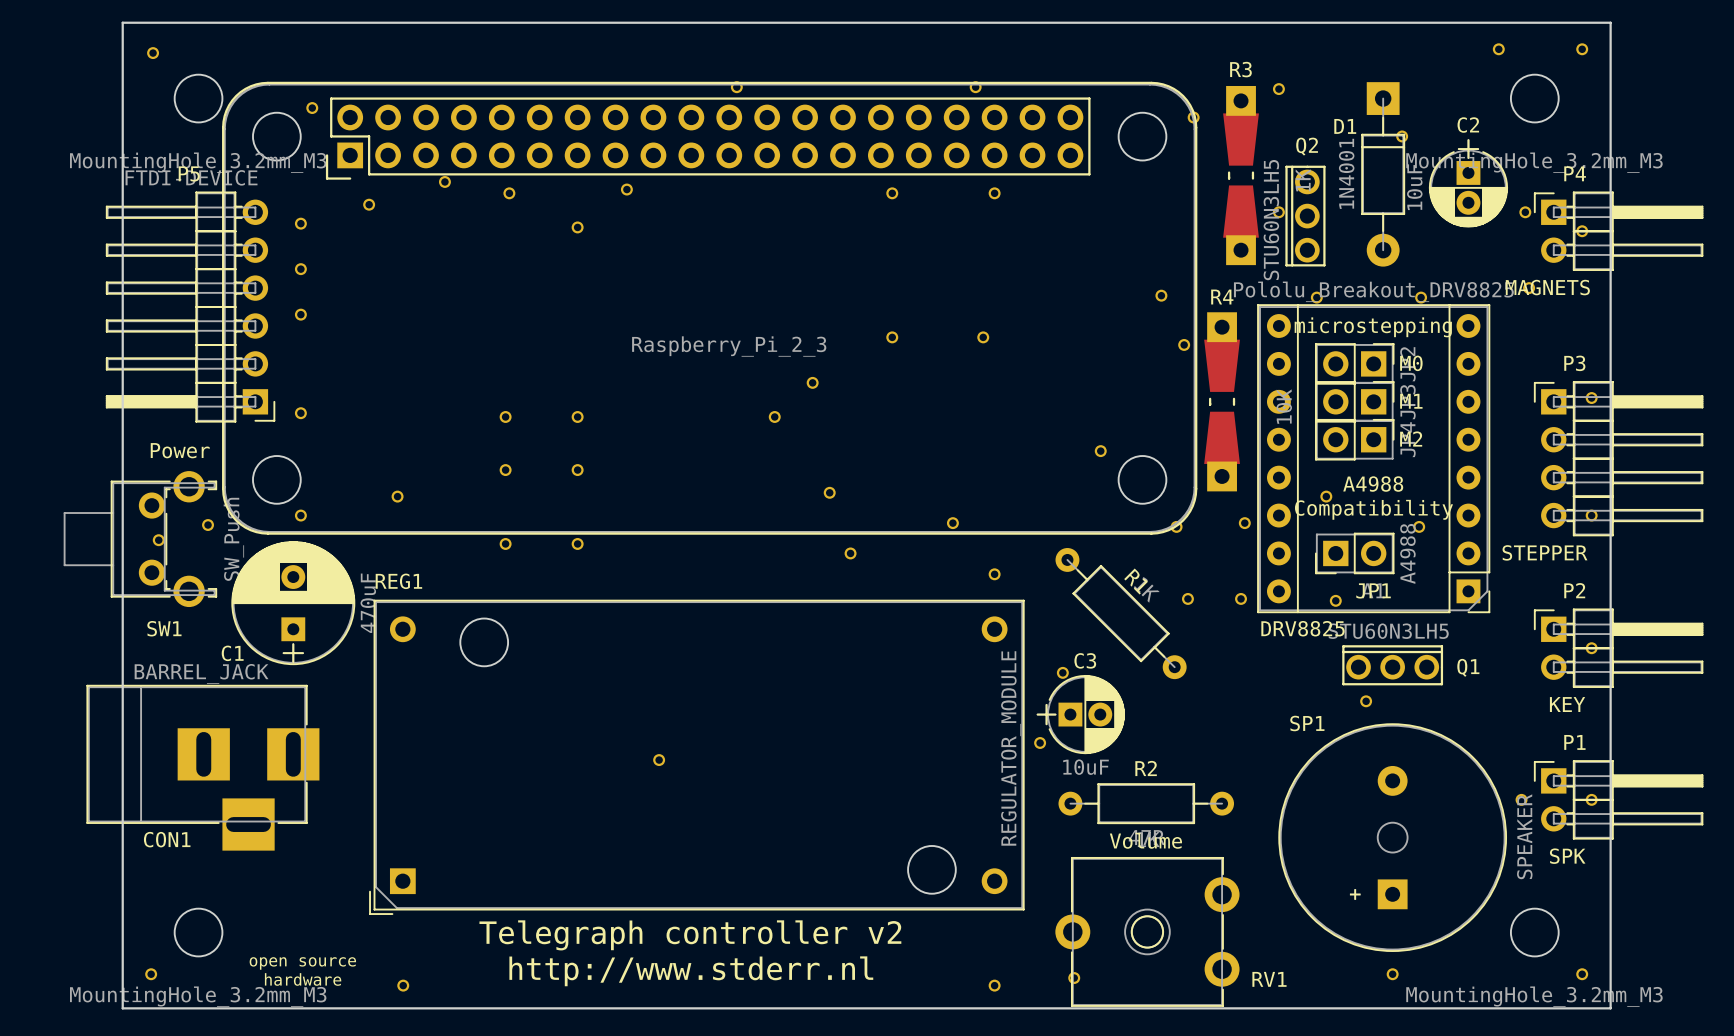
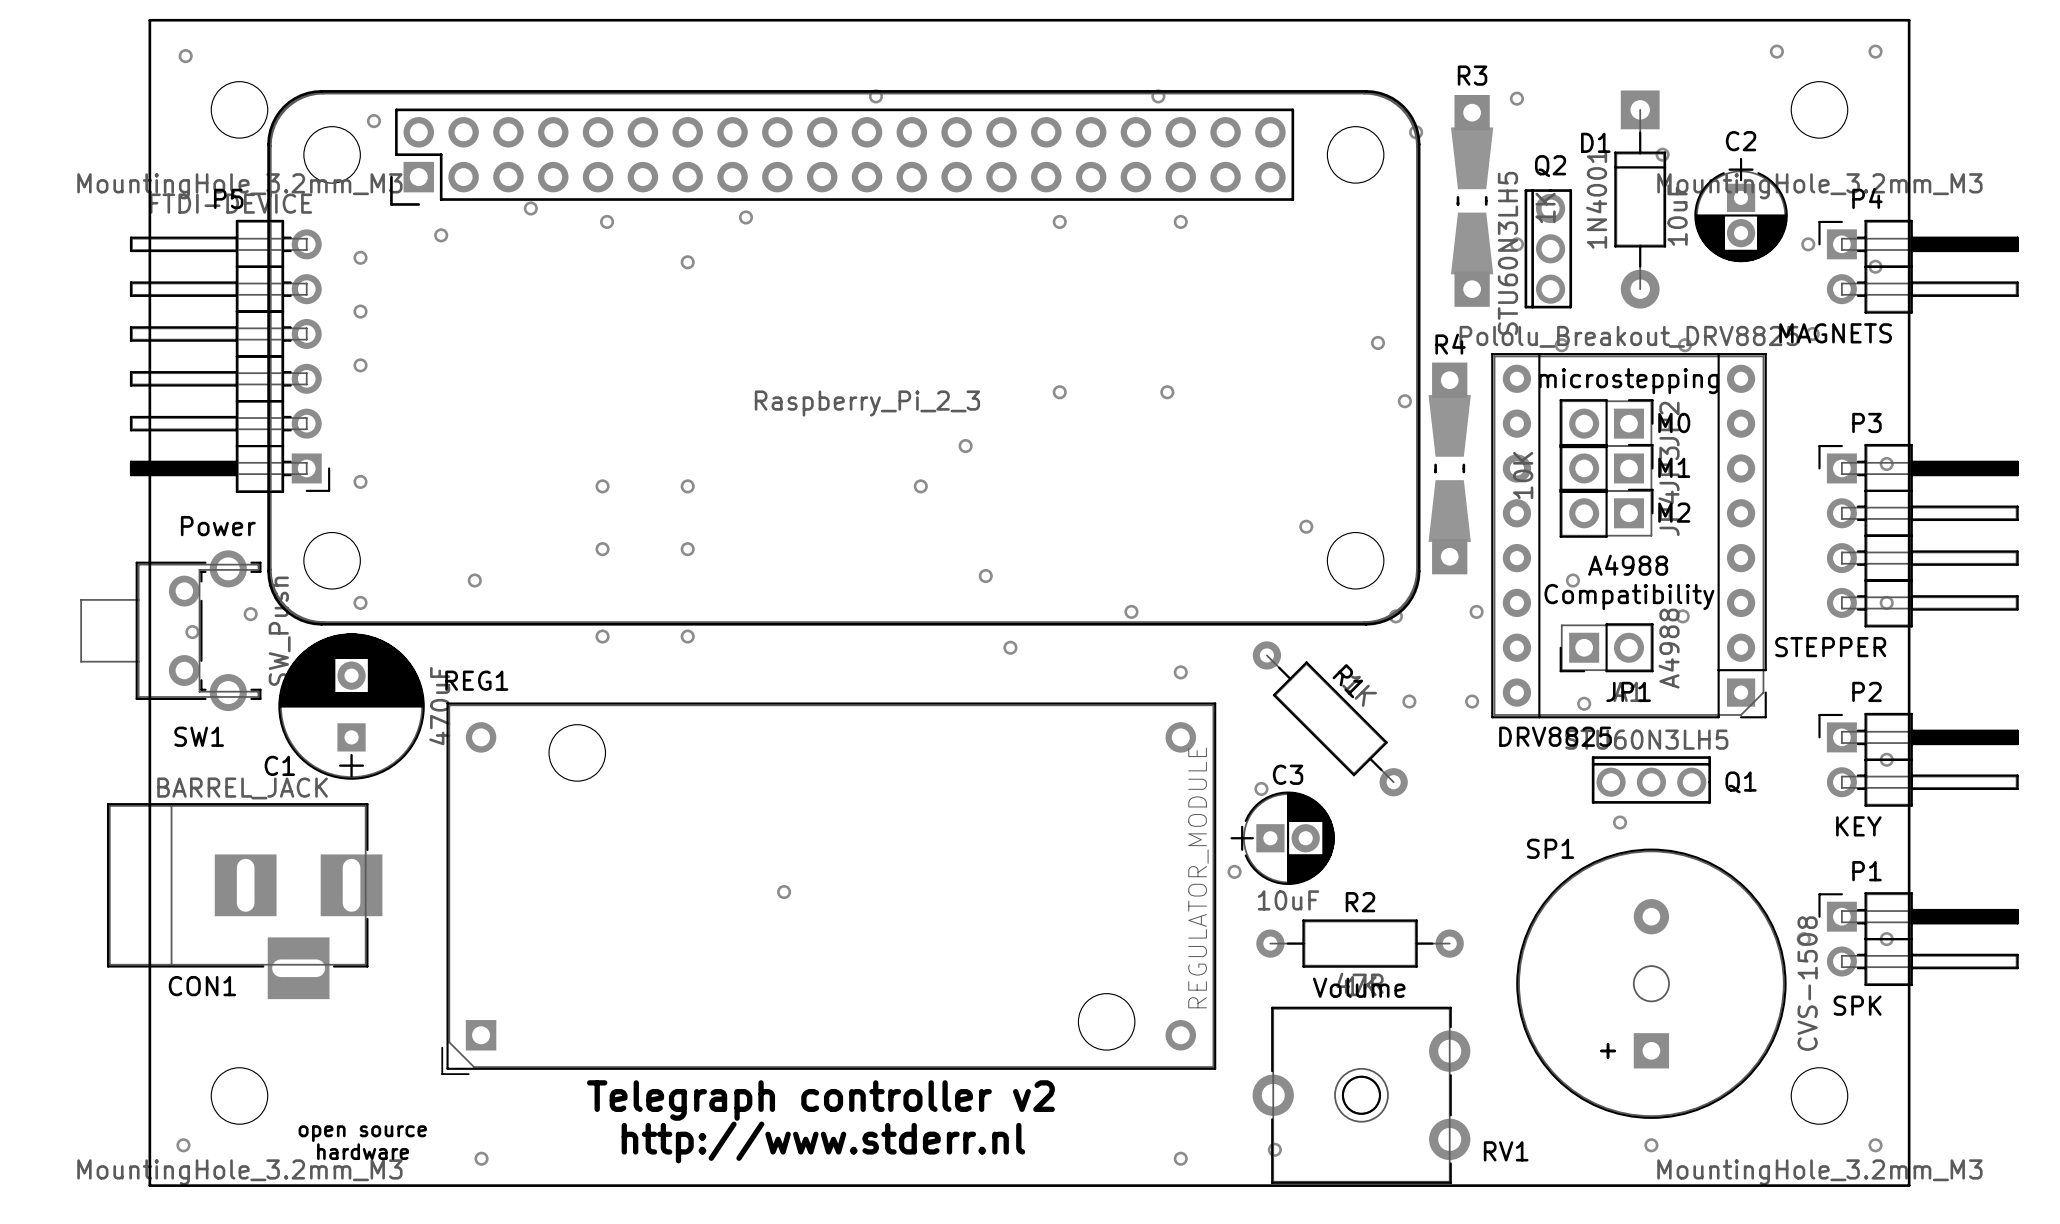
SP1 value: SPEAKER (1524, 836) -> CVS-1508 (1807, 983)

